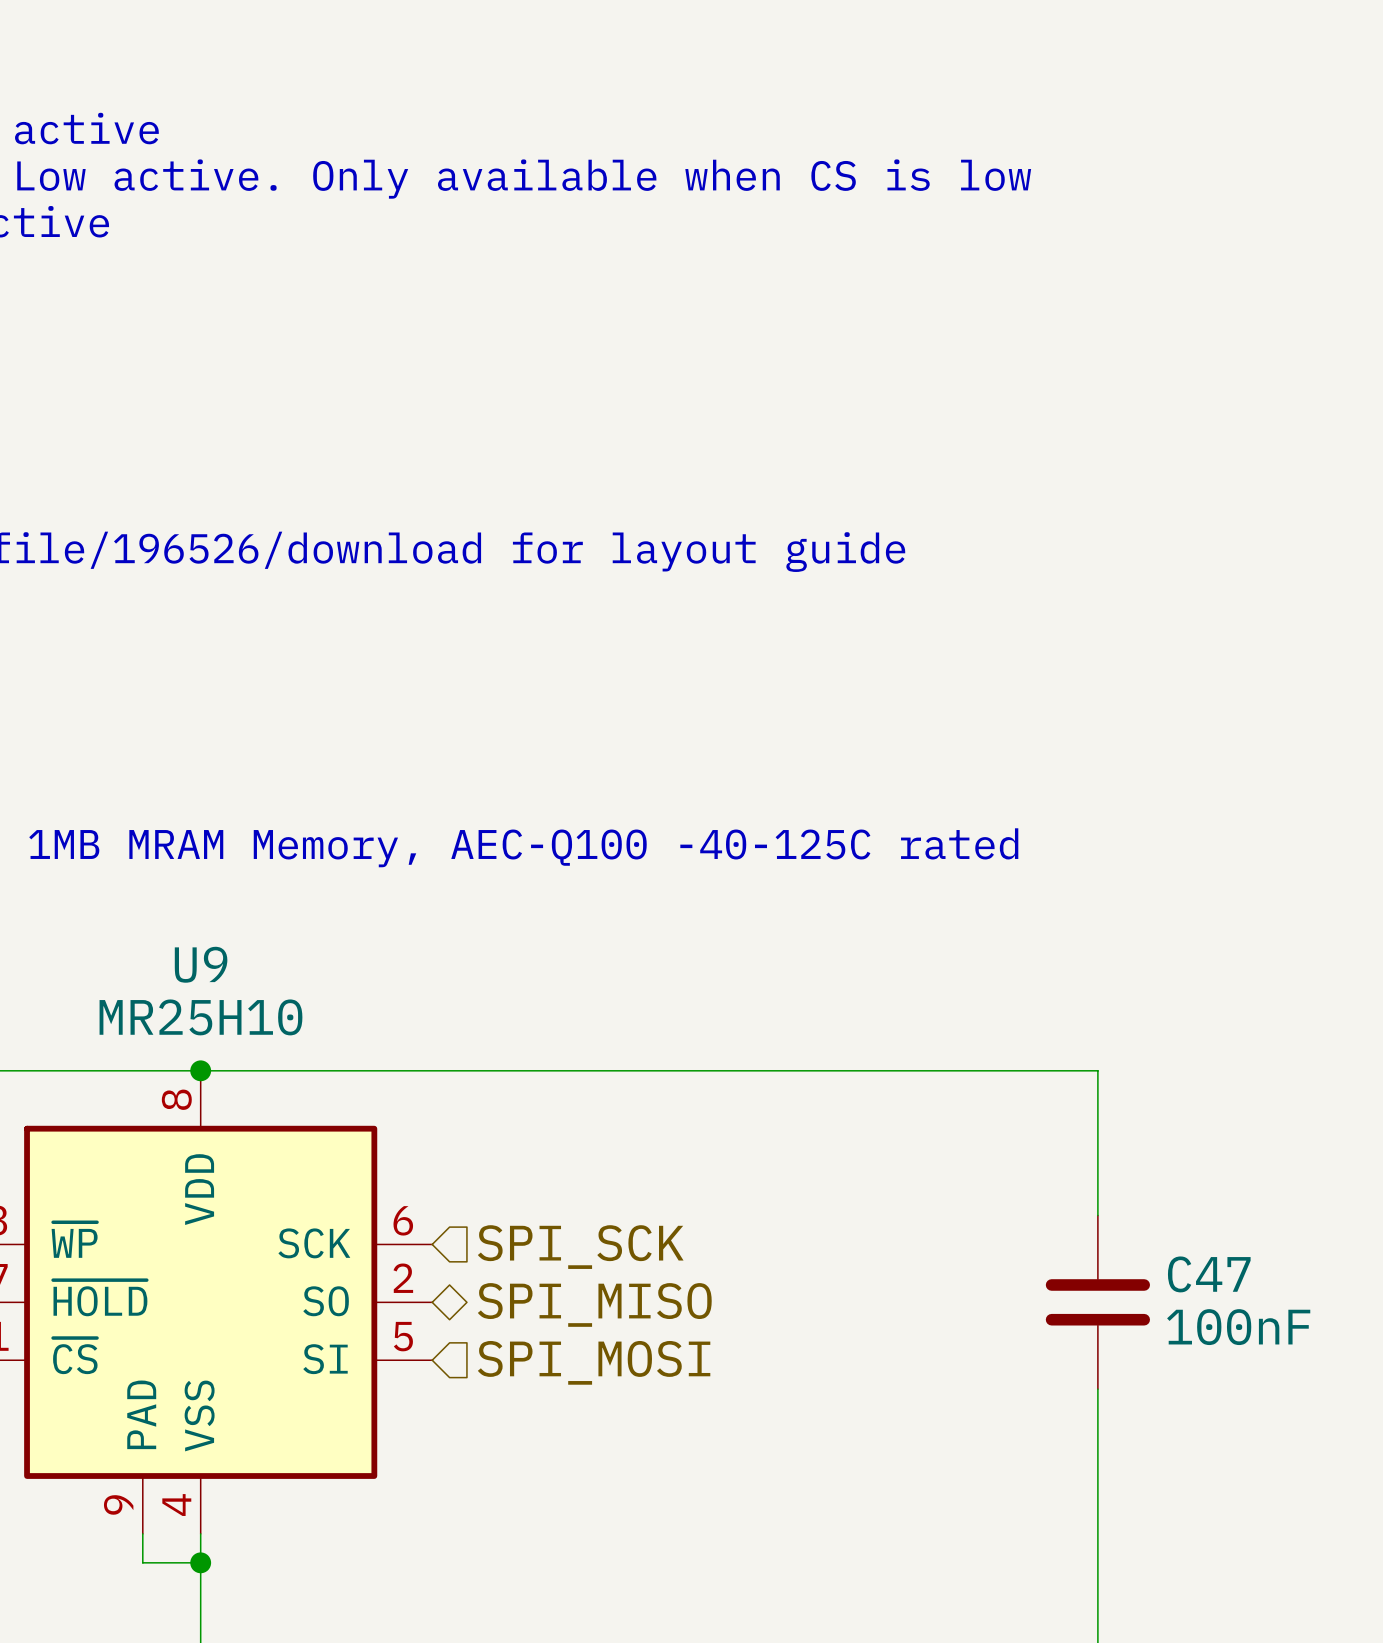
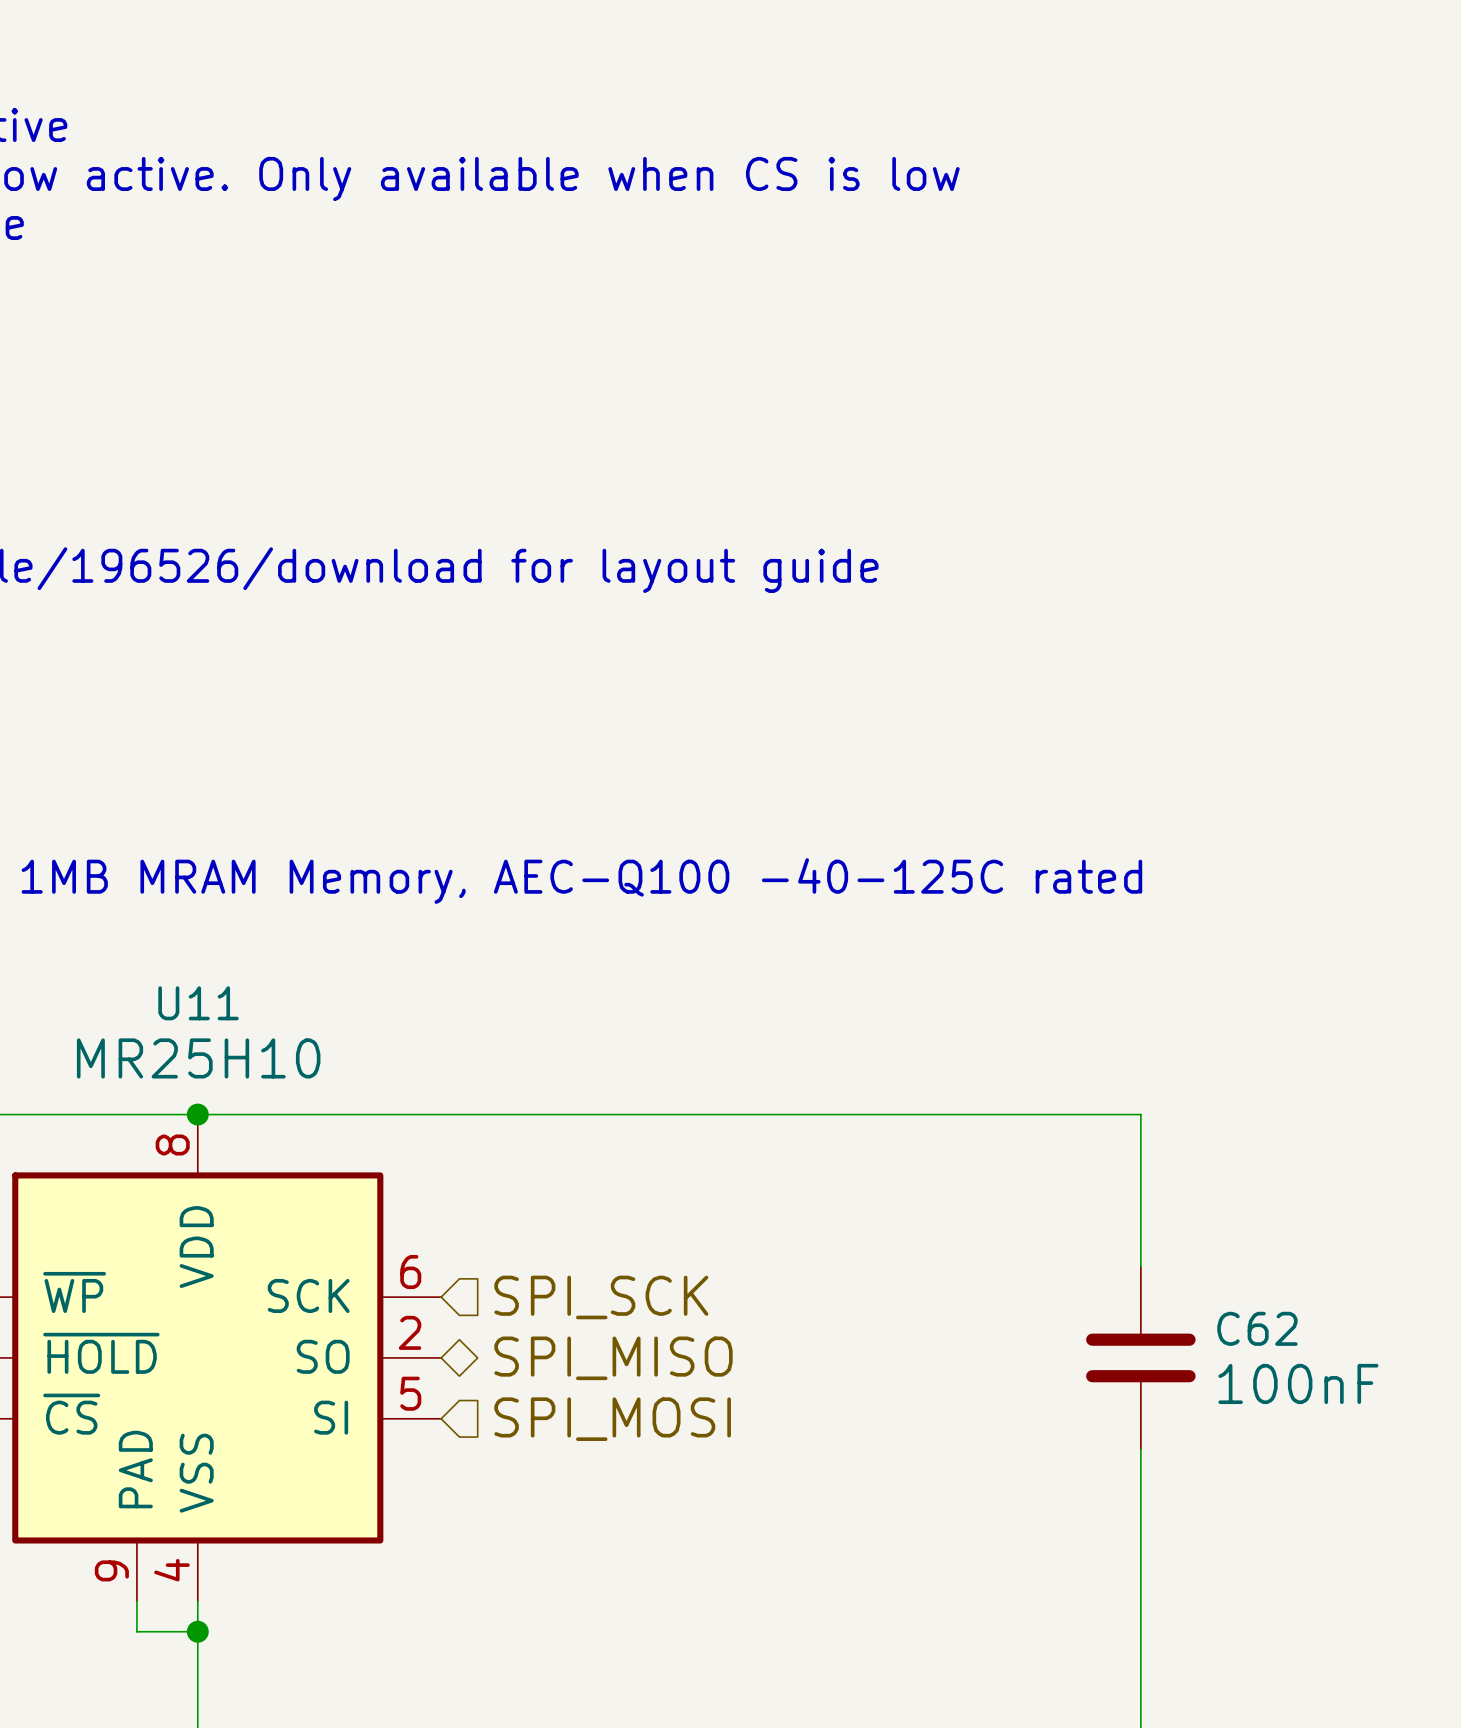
U9 name: U9 (201, 964) -> U11 (198, 1003)
C47 name: C47 (1209, 1274) -> C62 (1257, 1328)

